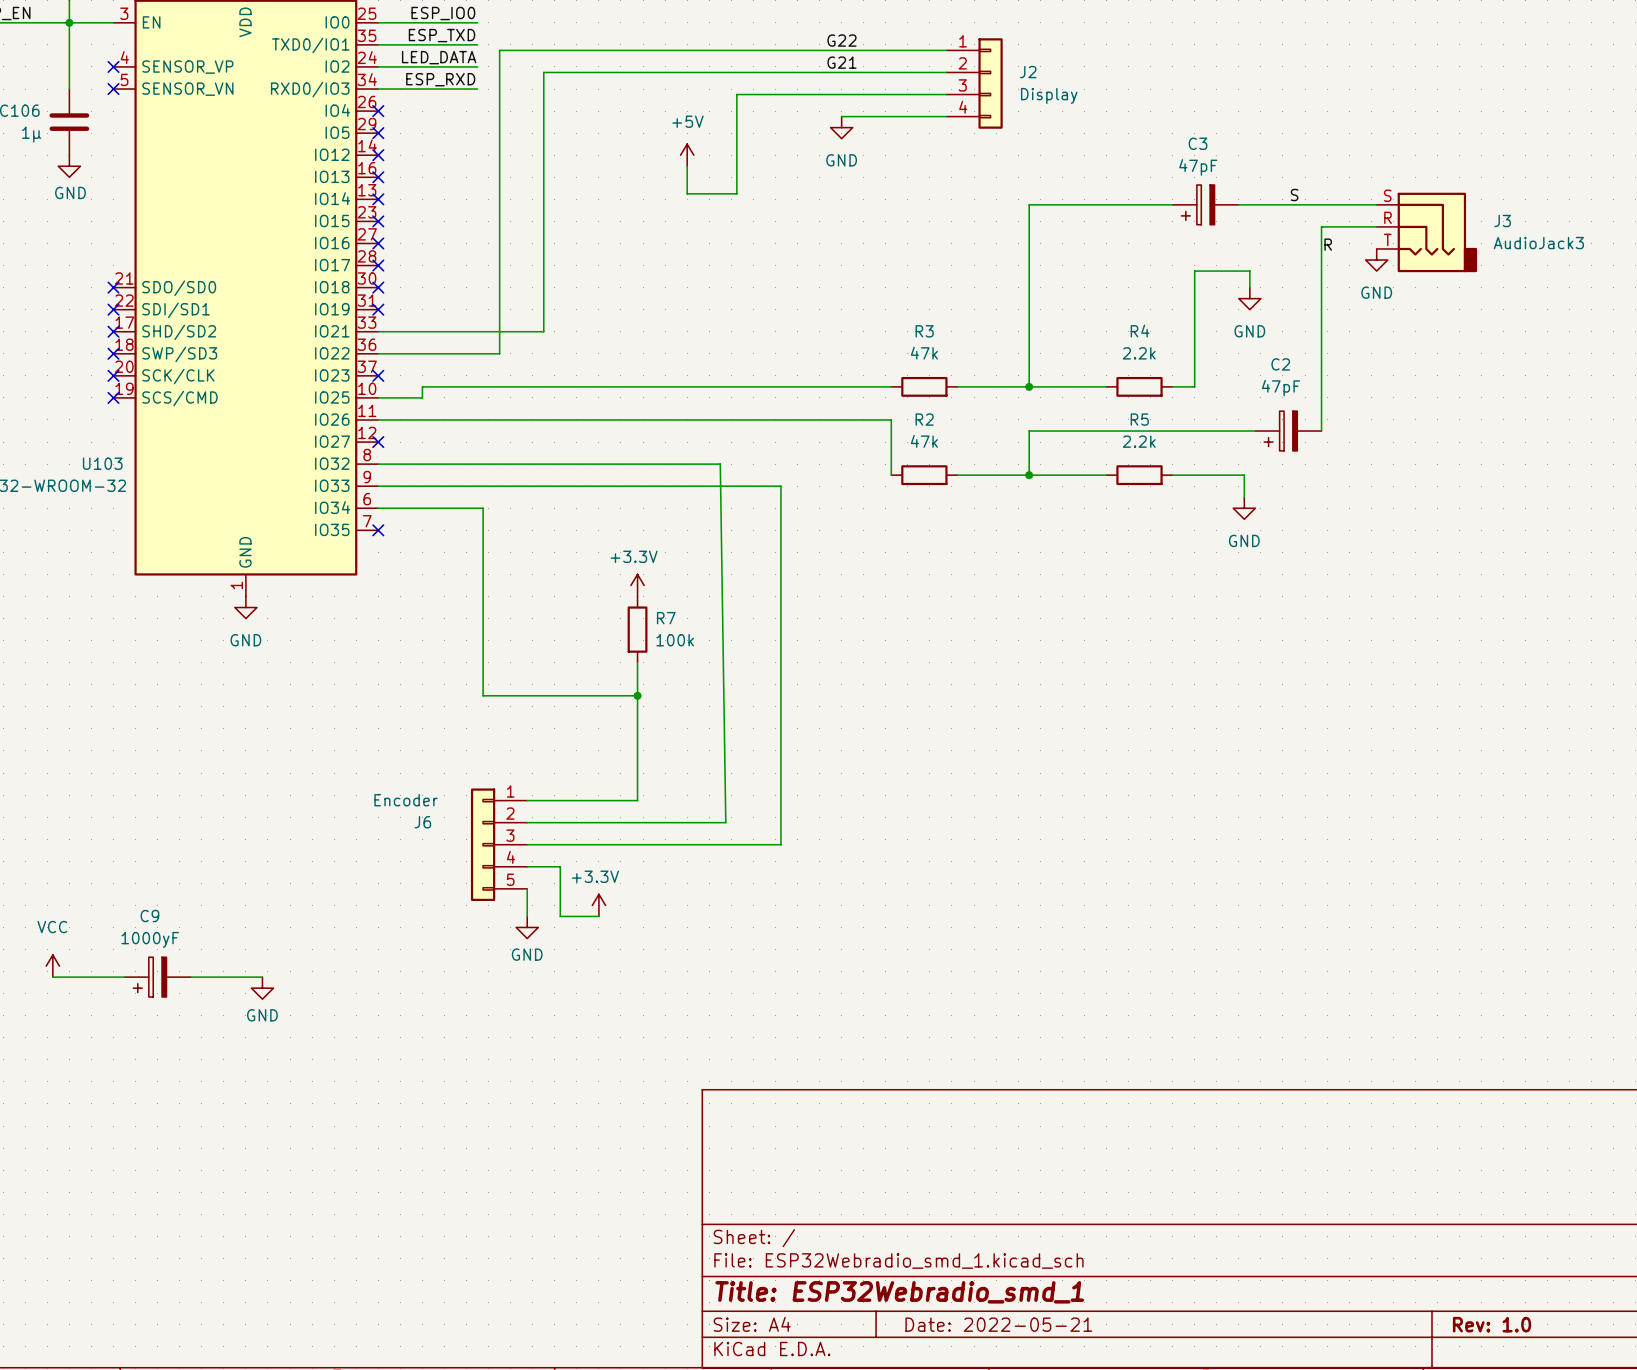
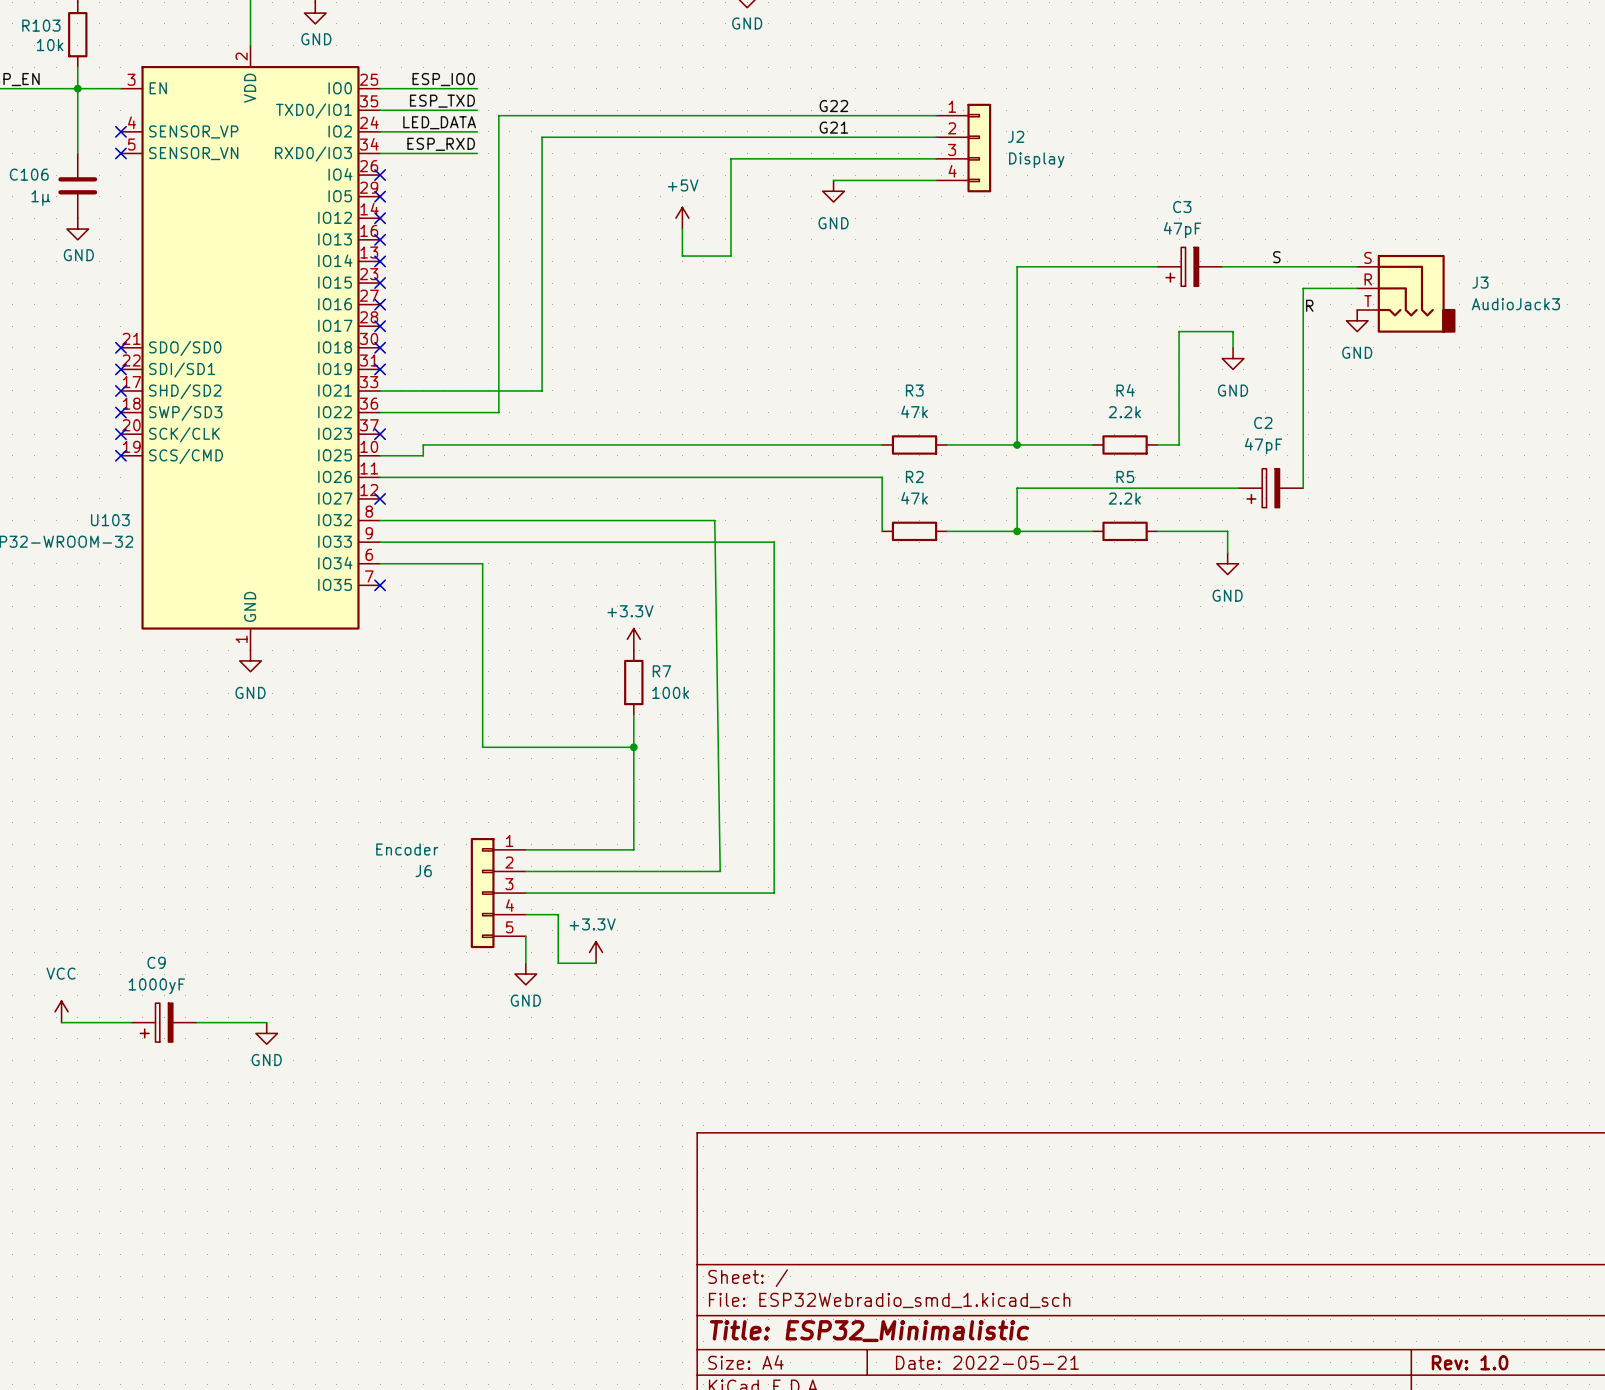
title block: Title: ESP32Webradio_smd_1 (899, 1292) -> Title: ESP32_Minimalistic (869, 1331)

